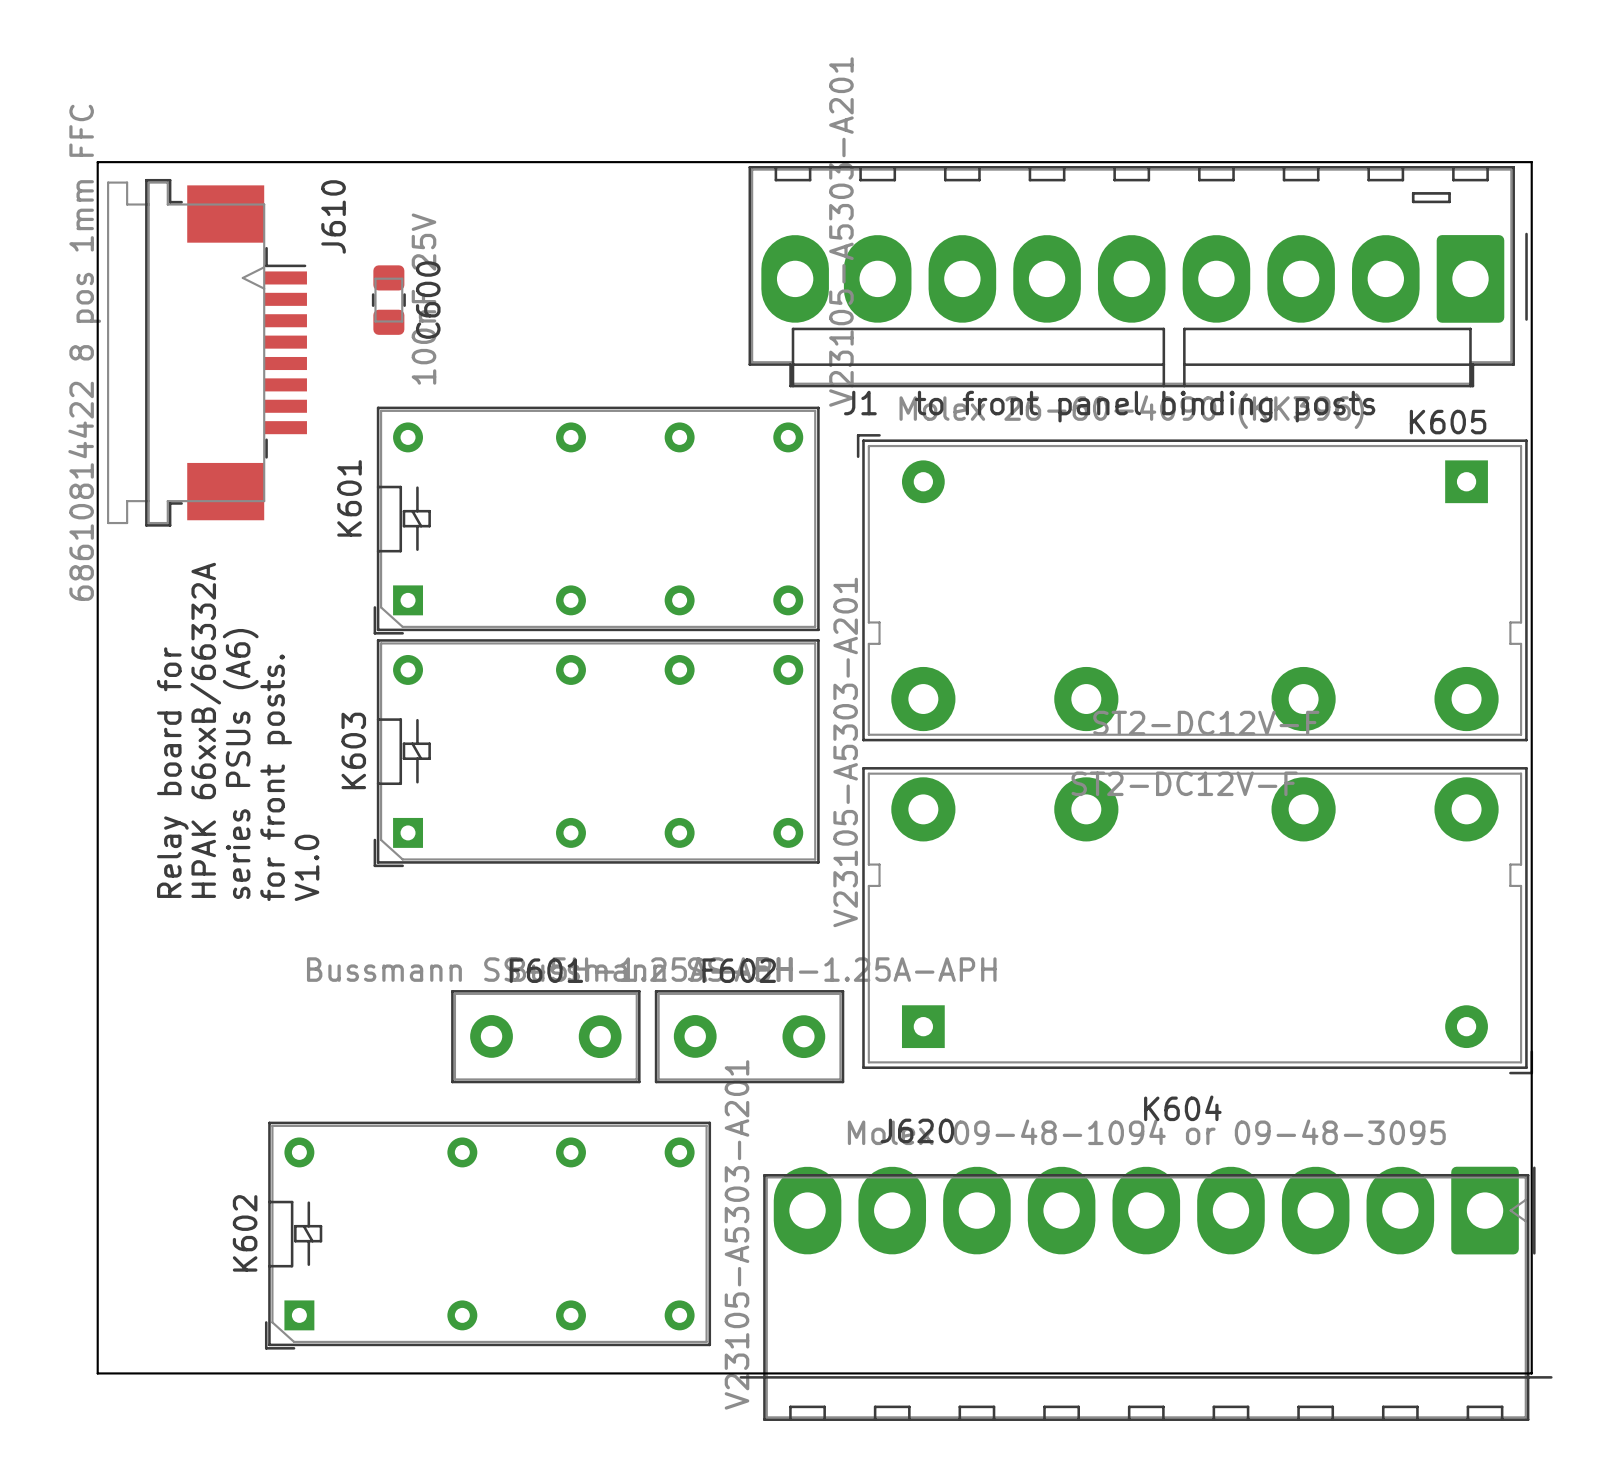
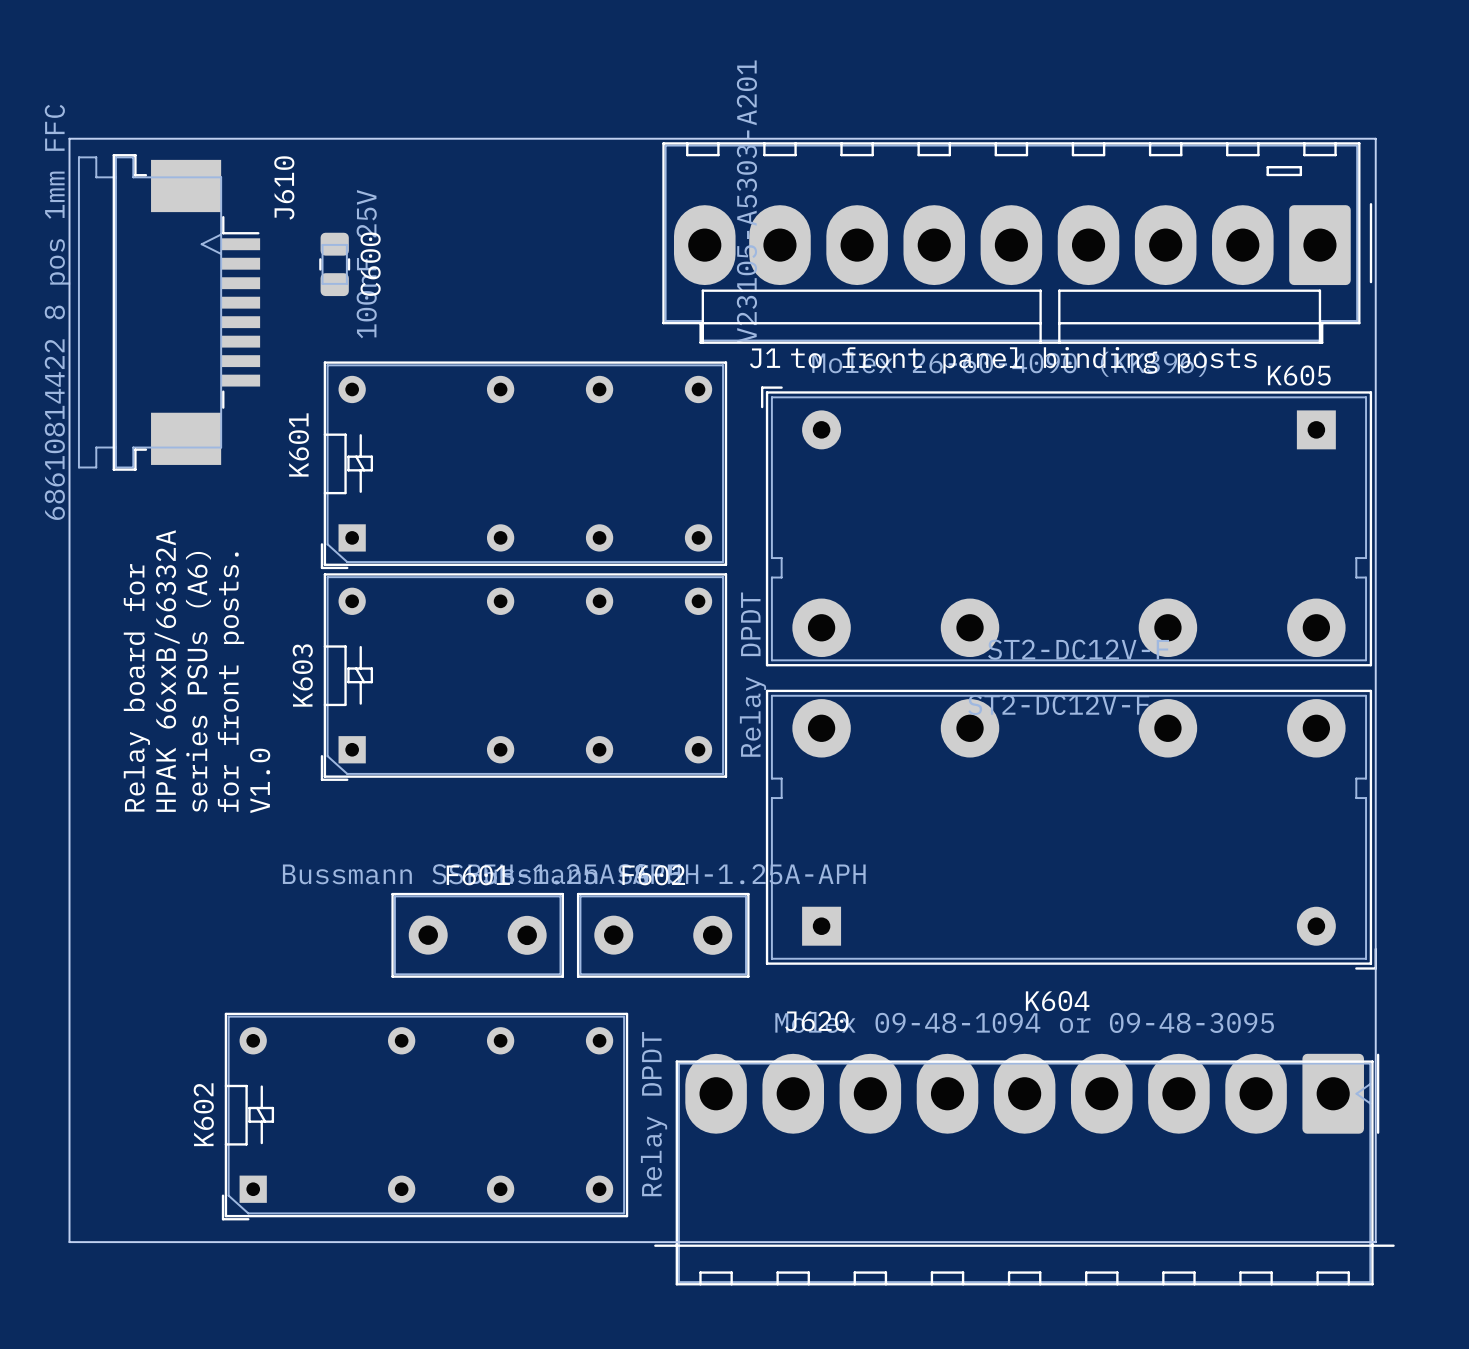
K603 value: V23105-A5303-A201 (845, 752) -> Relay DPDT (752, 674)
K602 value: V23105-A5303-A201 (736, 1234) -> Relay DPDT (654, 1114)

